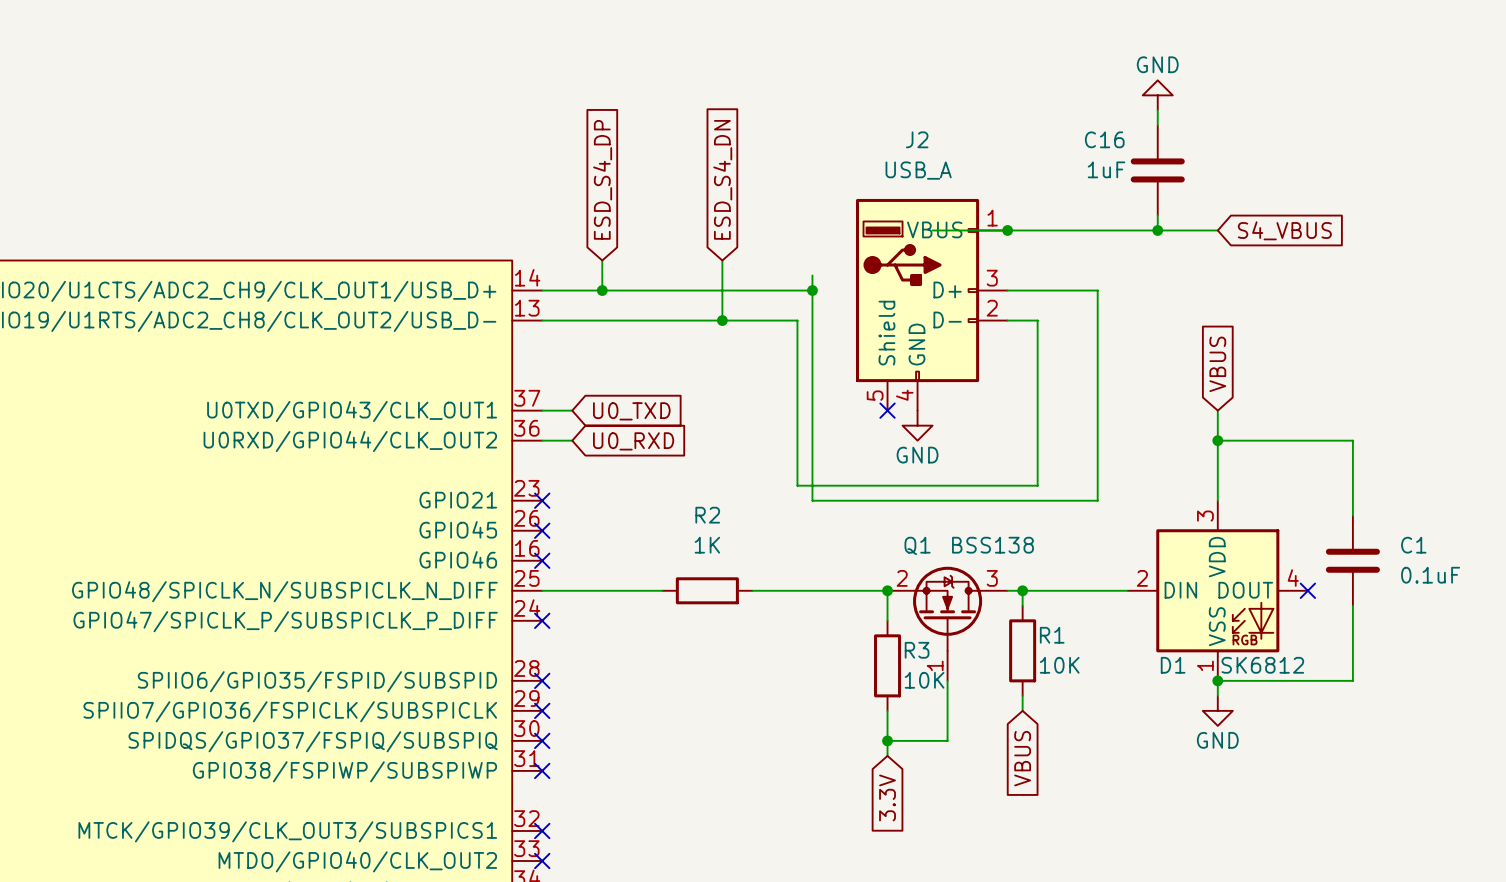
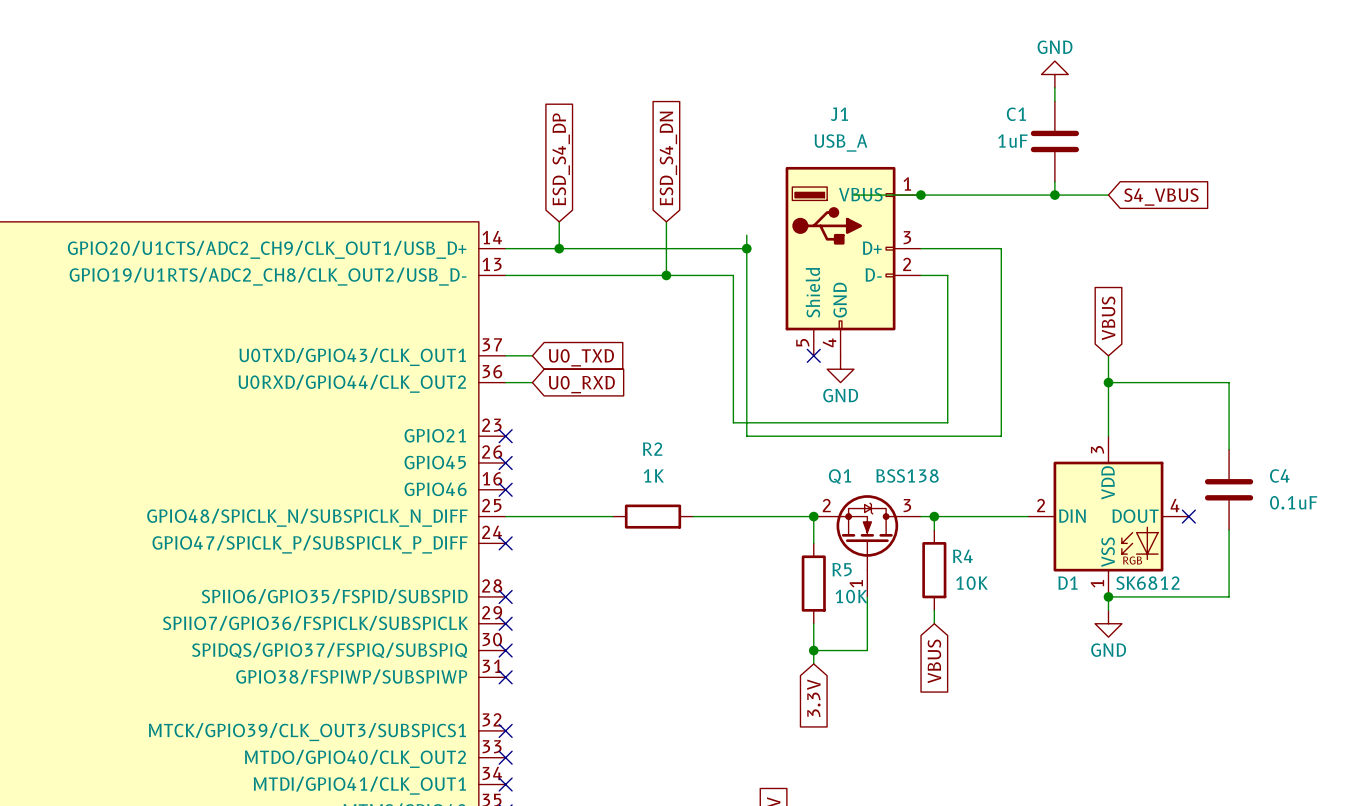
J2 name: J2 (917, 139) -> J1 (839, 114)
C16 name: C16 (1104, 139) -> C1 (1016, 114)
C1 name: C1 (1413, 545) -> C4 (1279, 475)
R1 name: R1 (1052, 635) -> R4 (962, 556)
R3 name: R3 (917, 650) -> R5 (842, 569)

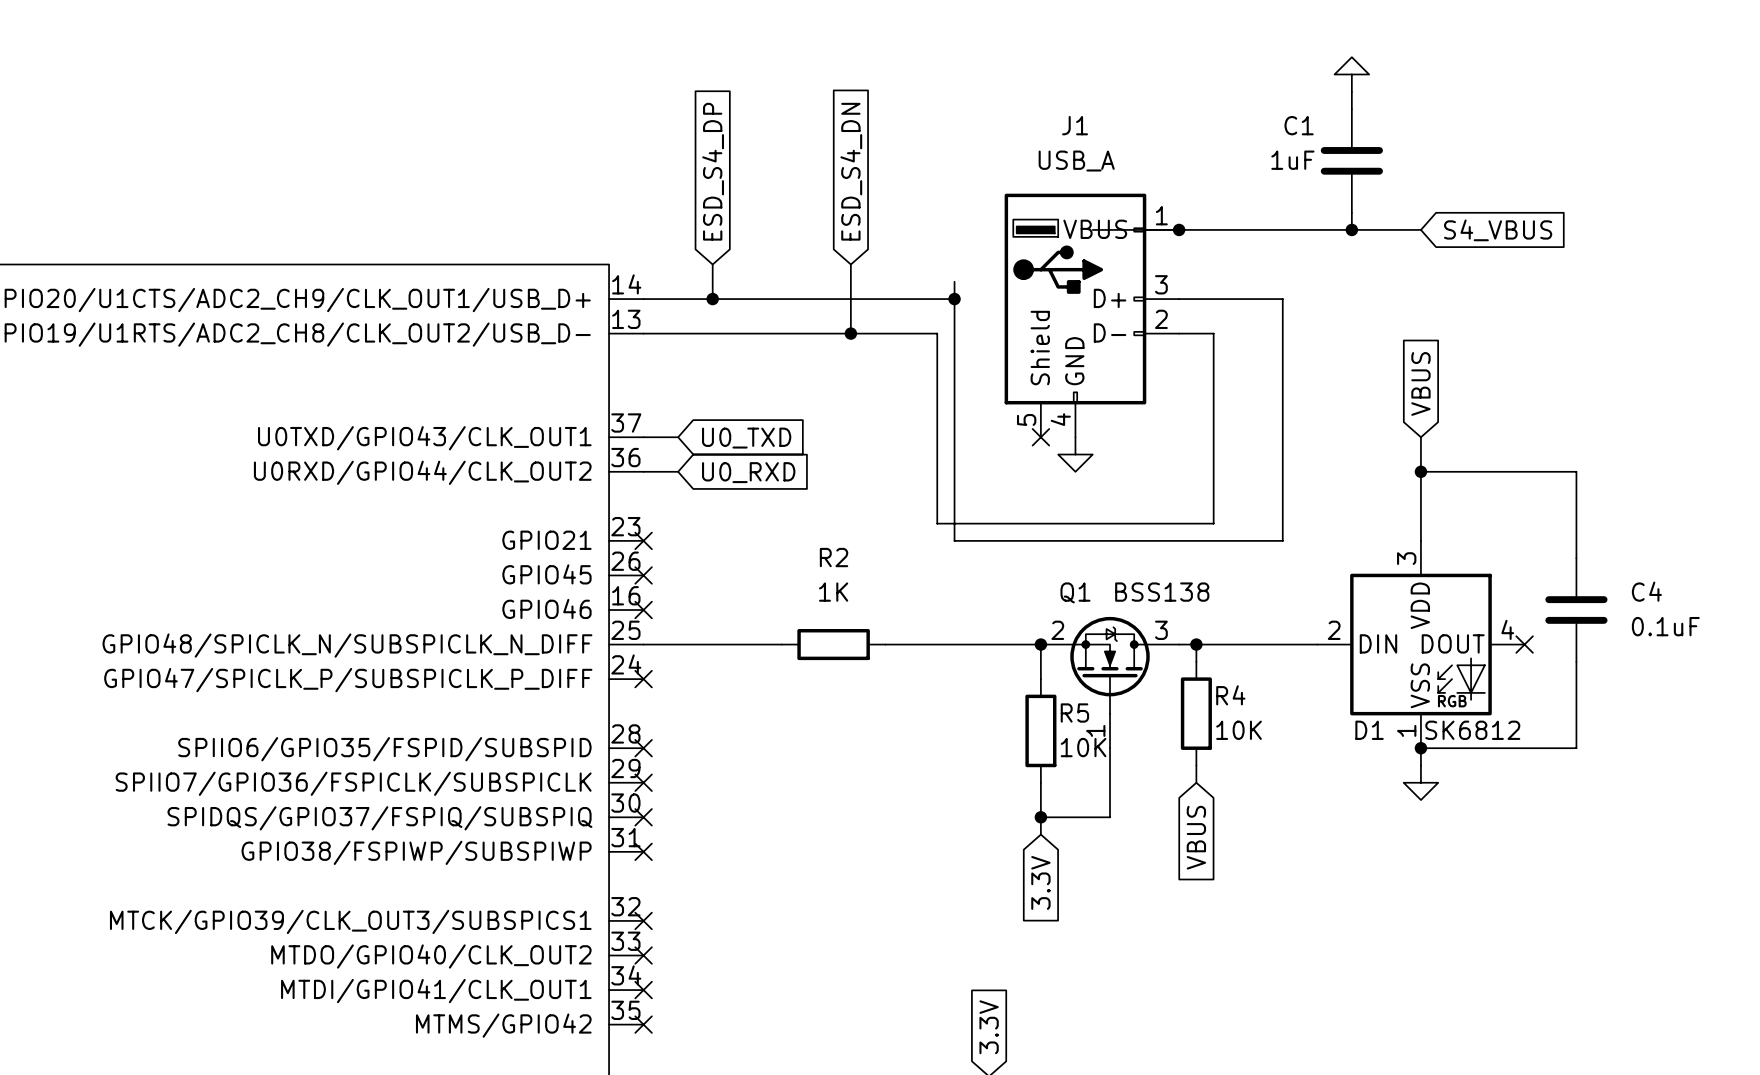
power symbol text: GND (1055, 47) -> none
power symbol text: GND (840, 395) -> none
power symbol text: GND (1108, 650) -> none

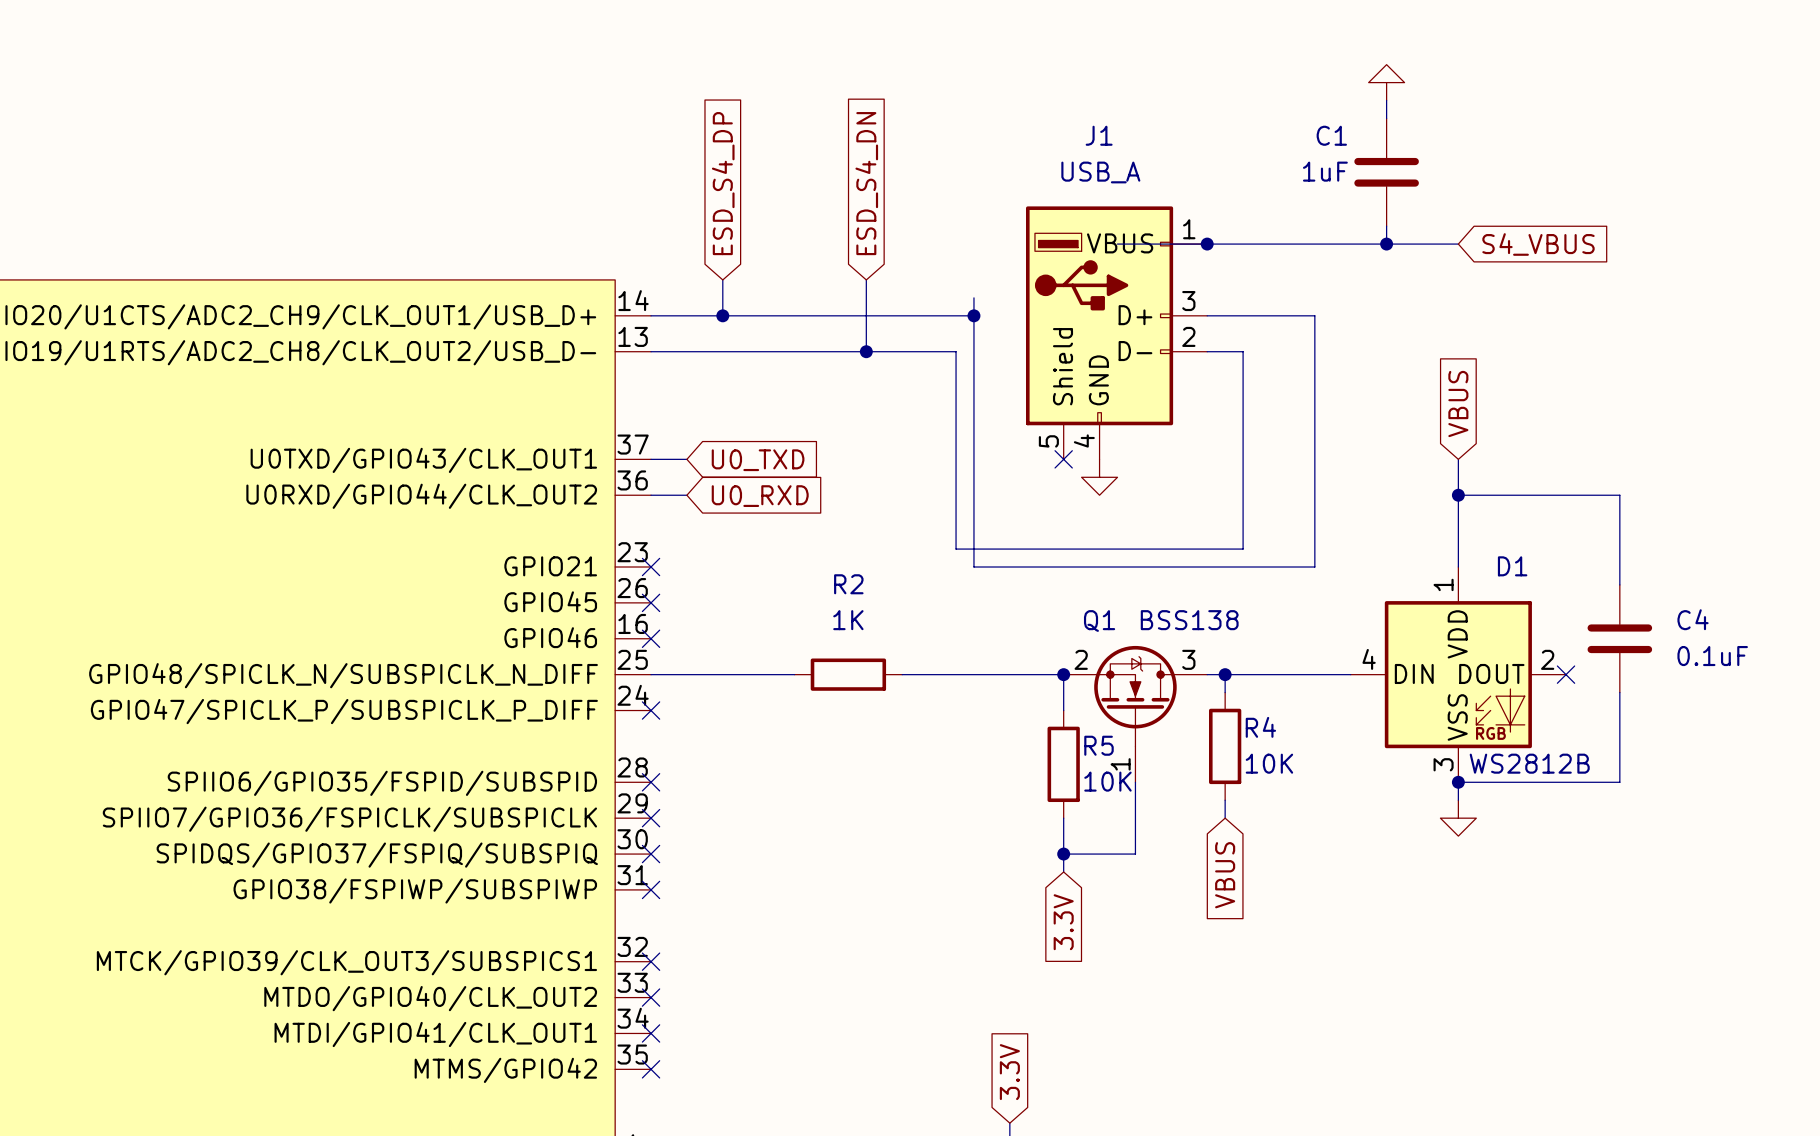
D1 pin number: 3 (1406, 558) -> 1 (1443, 584)
D1 pin number: 4 (1507, 629) -> 2 (1547, 659)
D1 pin number: 2 (1334, 630) -> 4 (1369, 659)
D1 name position: D1 (1369, 730) -> D1 (1512, 566)
D1 pin number: 1 (1406, 730) -> 3 (1443, 764)
D1 value: SK6812 (1472, 730) -> WS2812B (1529, 763)

